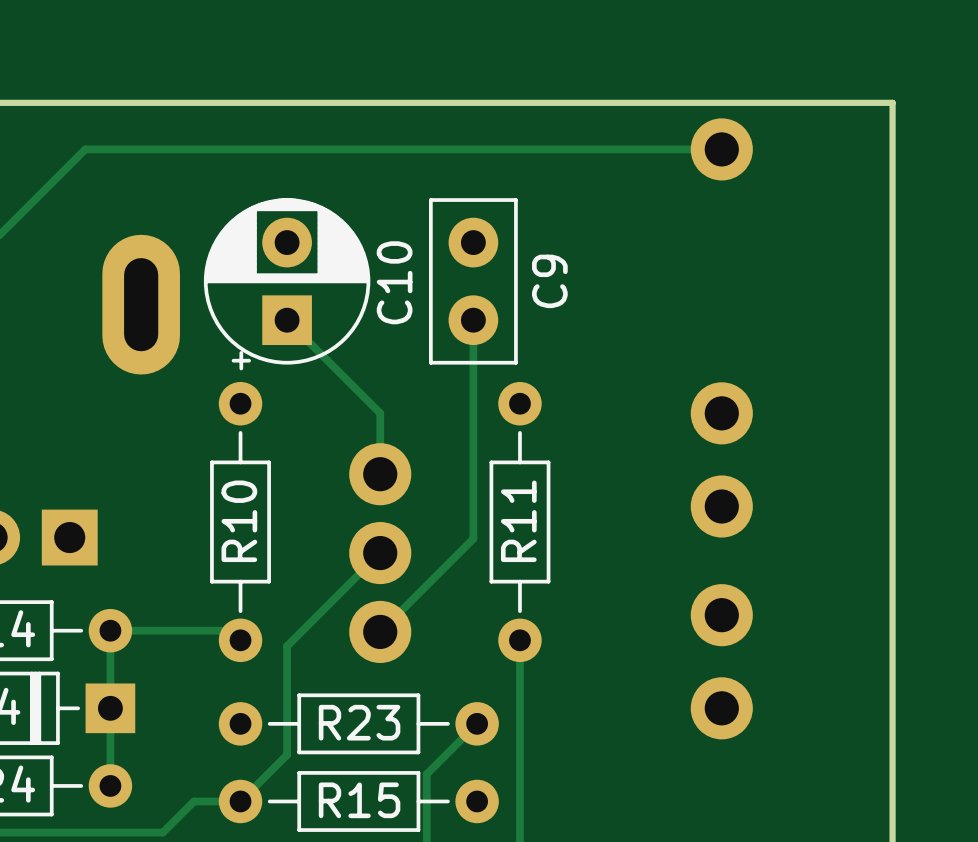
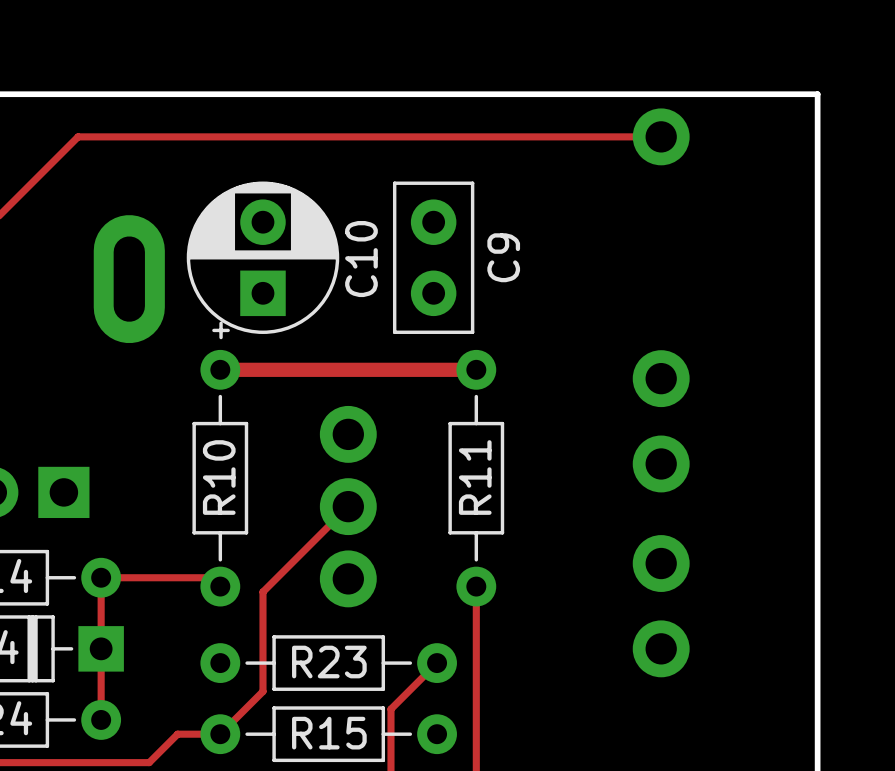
track: (287, 320) (380, 413) (380, 474) -> none
track: (473, 320) (473, 538) (380, 631) -> none
track: none -> (220, 369) (476, 369)

